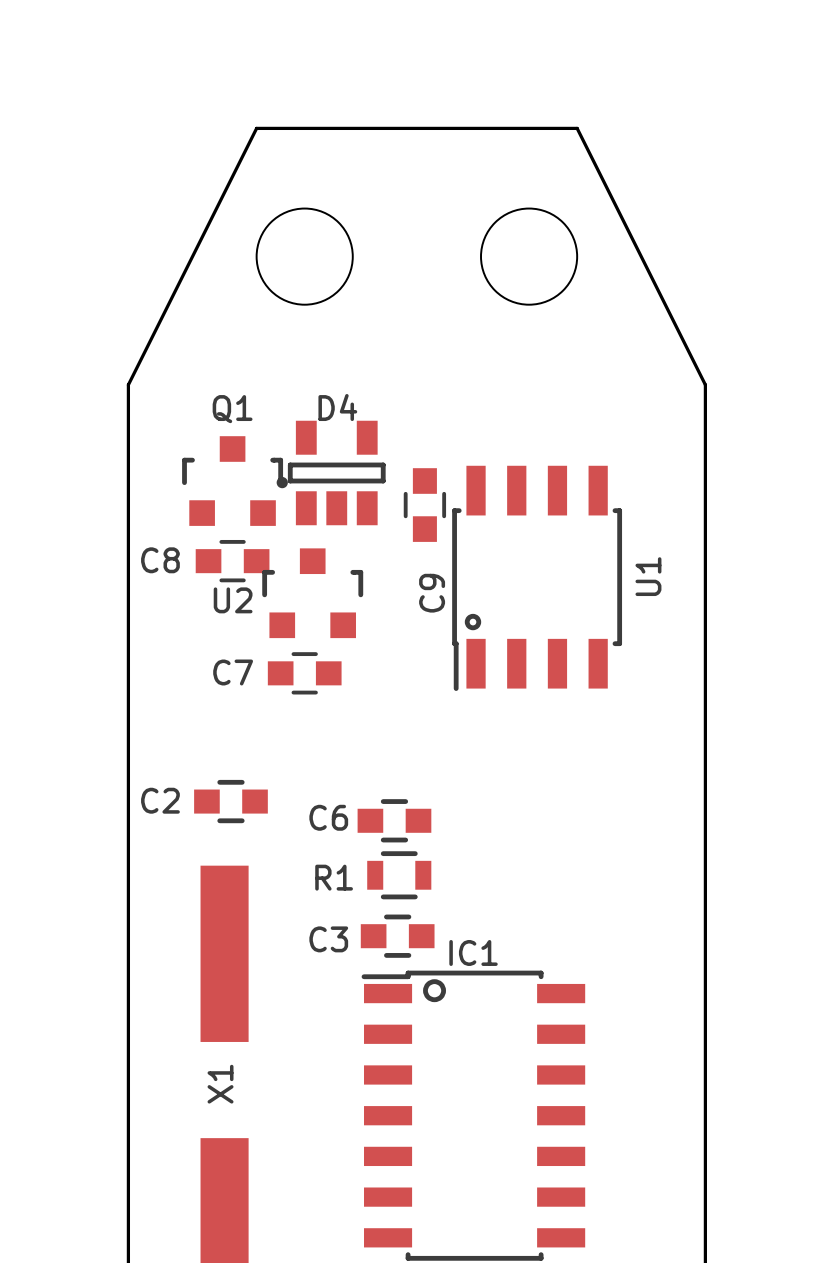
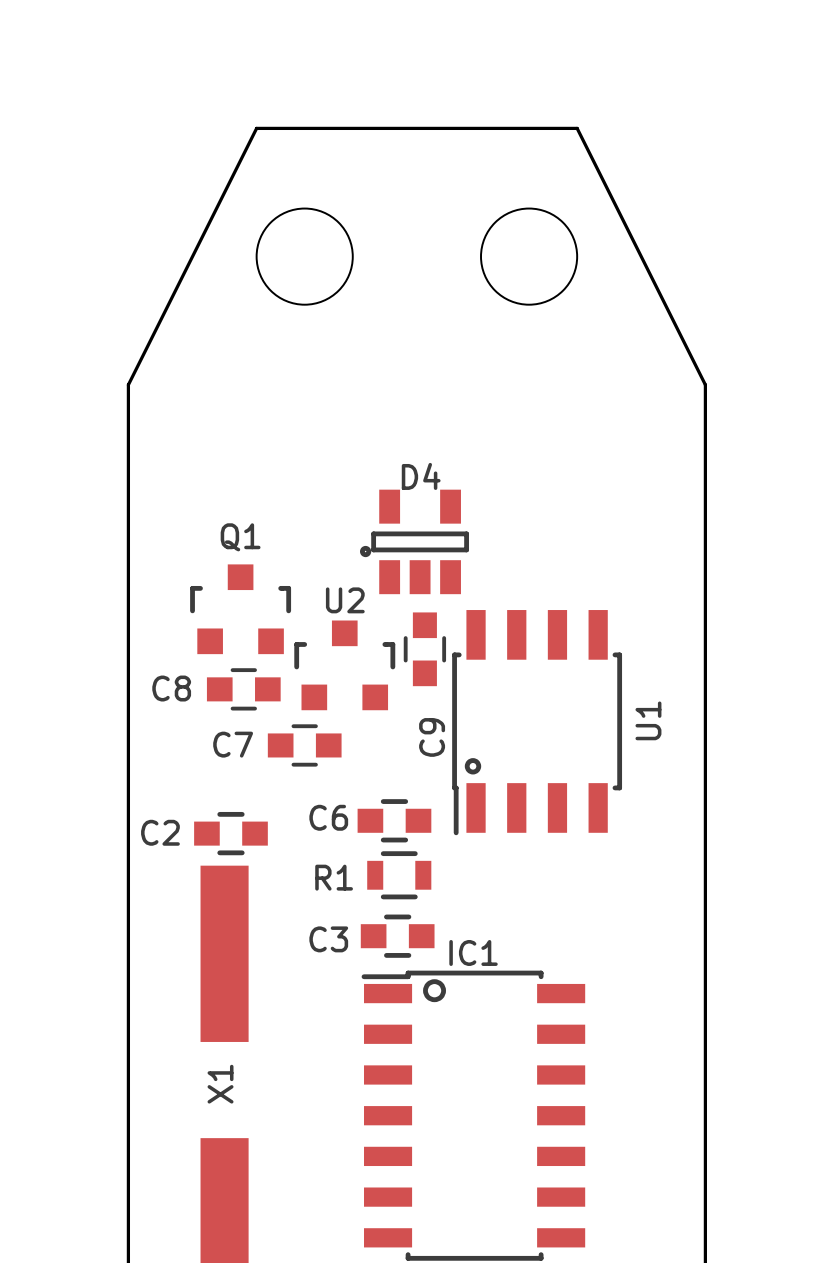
D4 position: (331, 472) -> (414, 541)
Q1 position: (232, 481) -> (240, 609)
C9 position: (424, 505) -> (424, 649)
C8 position: (232, 561) -> (243, 689)
U1 position: (537, 578) -> (537, 722)
U2 position: (312, 593) -> (344, 665)
U2 name position: U2 (233, 600) -> U2 (345, 600)
C7 position: (304, 673) -> (304, 745)
C2 position: (230, 801) -> (230, 833)

